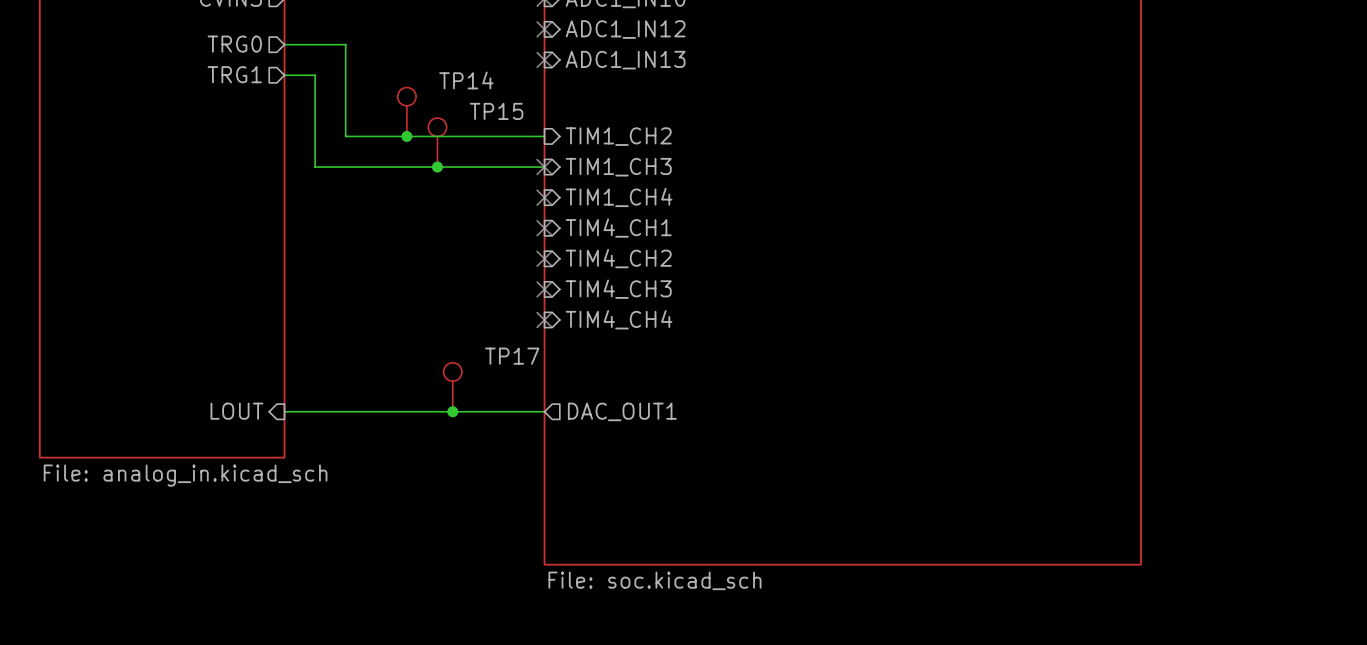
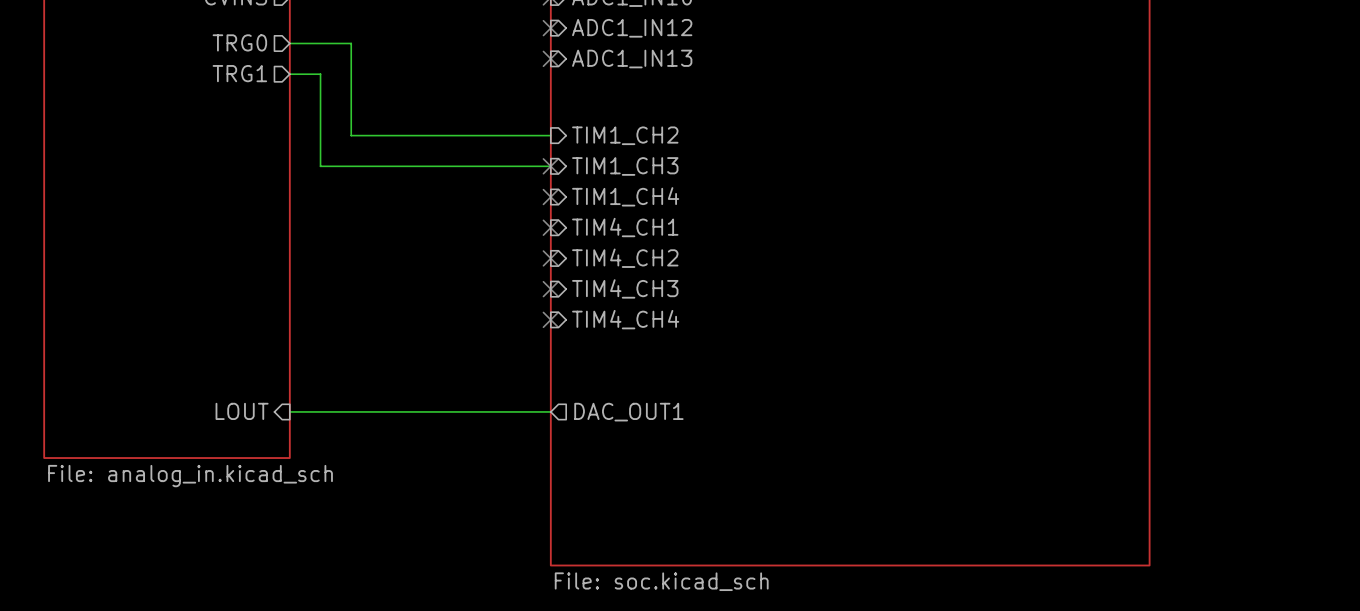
TP14: (406, 111) -> none
junction: (406, 136) -> none
TP15: (437, 142) -> none
junction: (437, 167) -> none
TP17: (452, 387) -> none
junction: (452, 411) -> none

